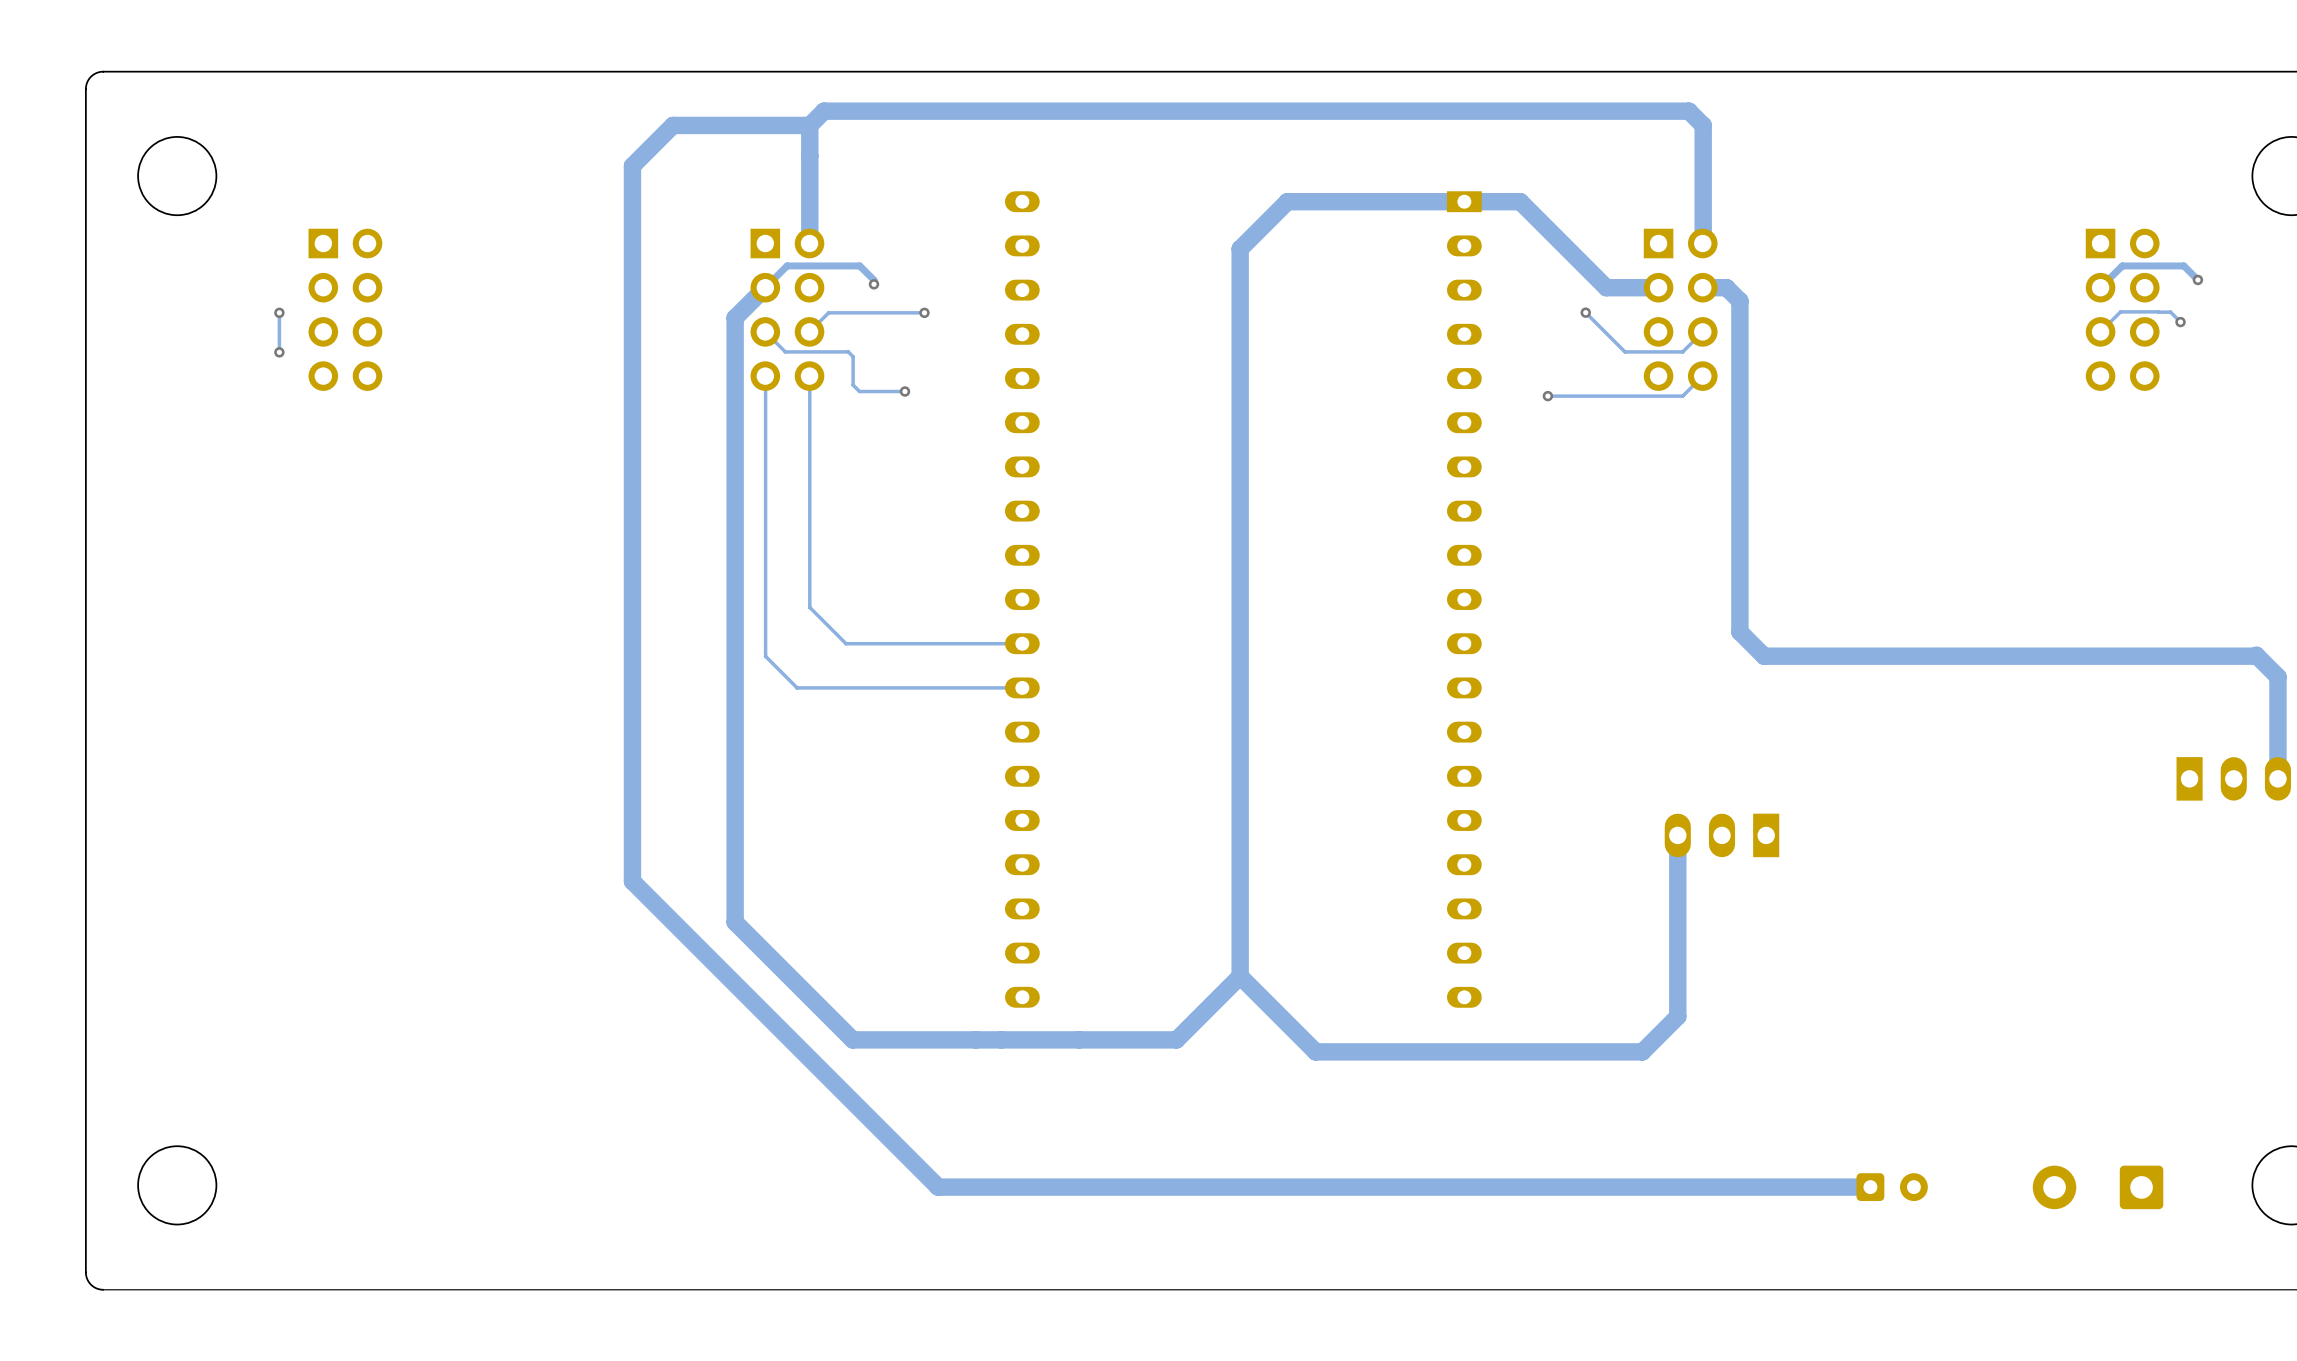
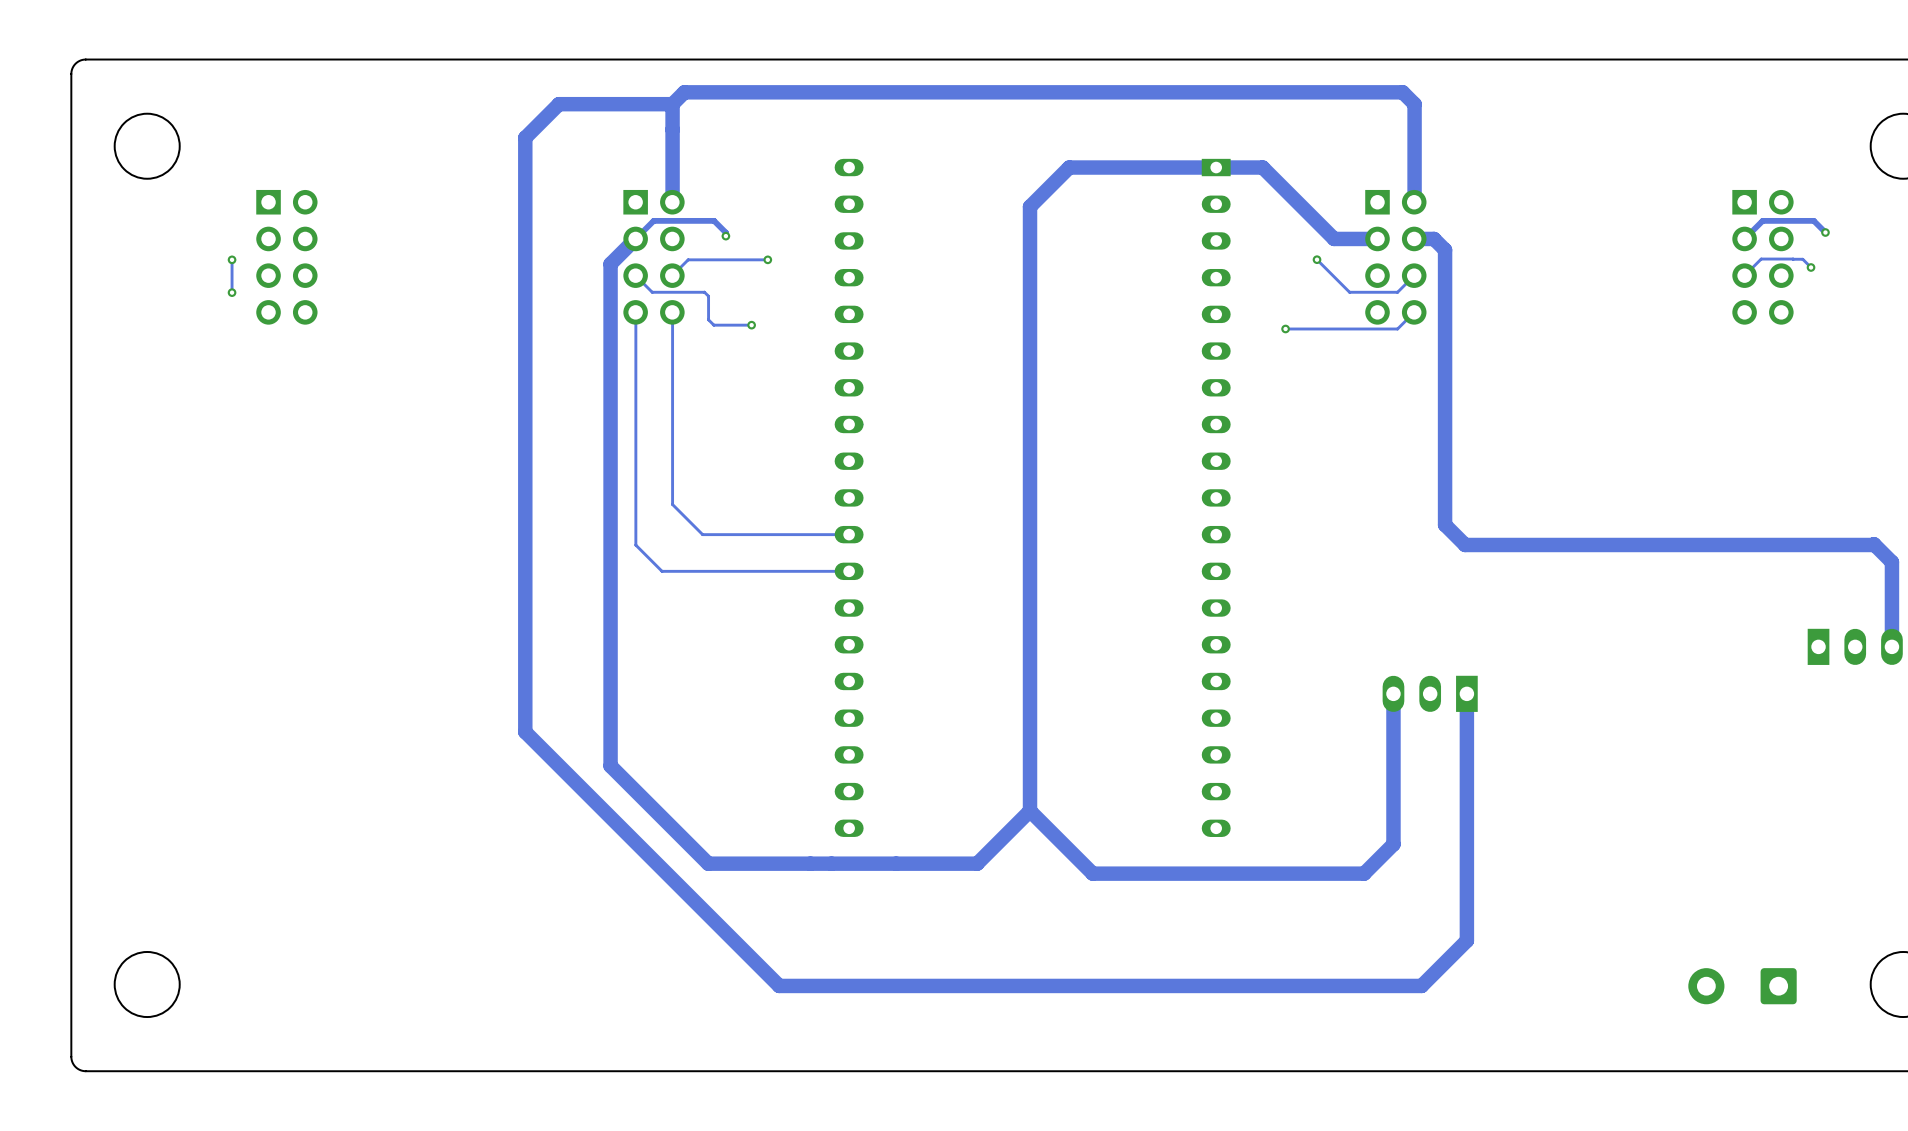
track: (1870, 1187) (1711, 1187) -> (1466, 693) (1466, 940) (1421, 985)
part: (1892, 1187) -> none

